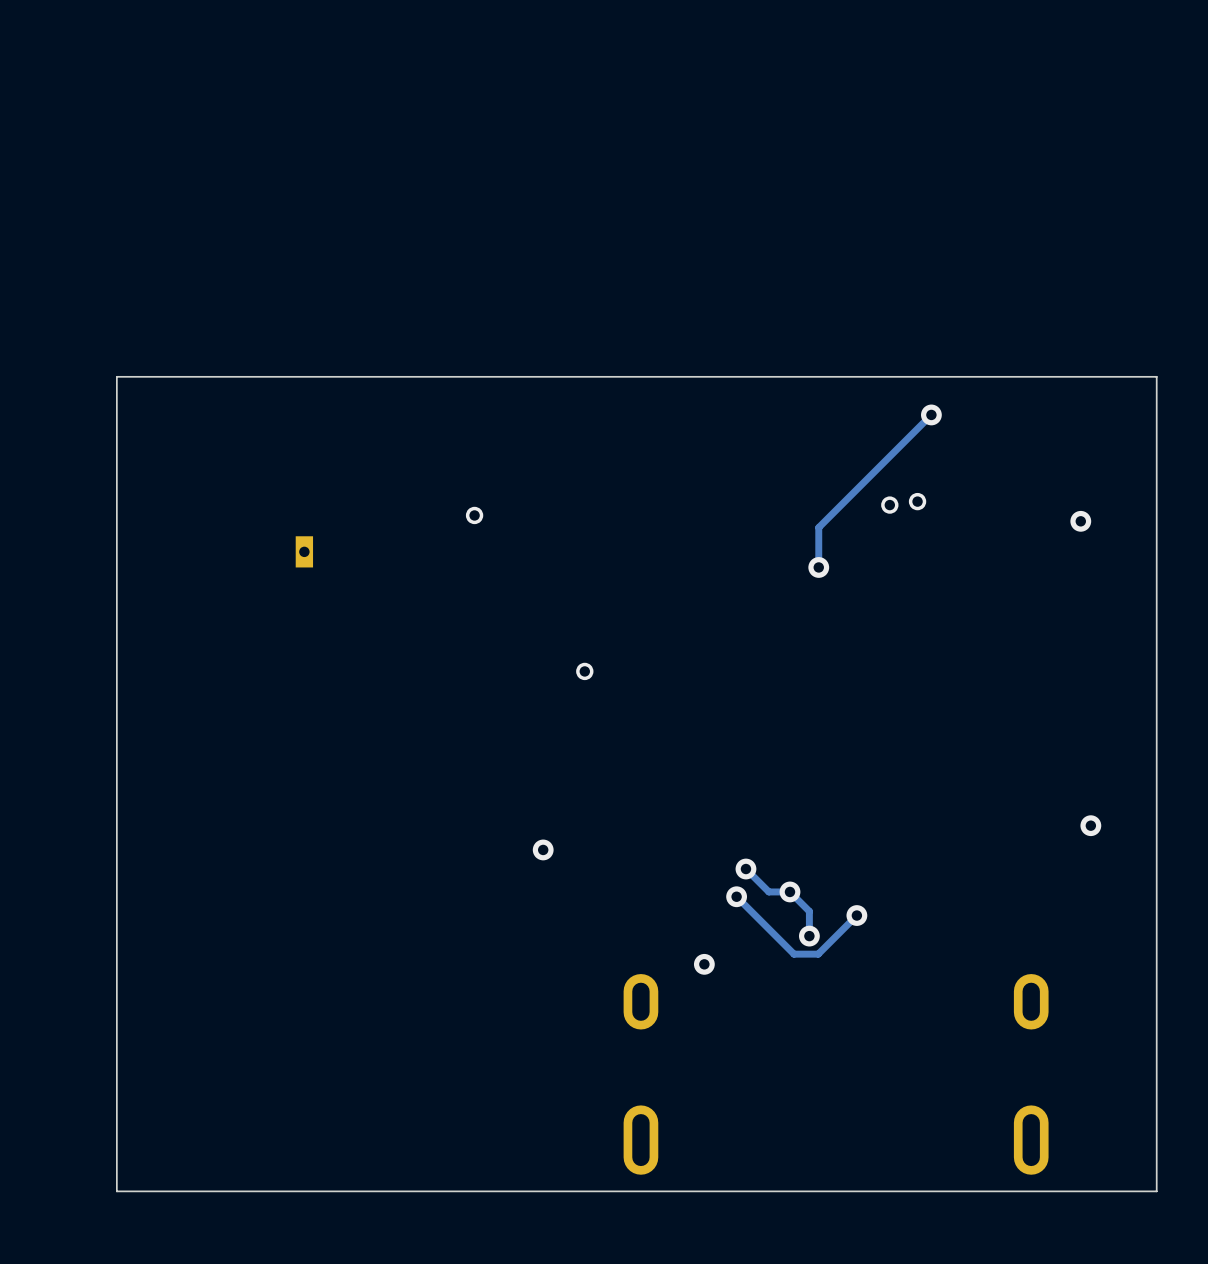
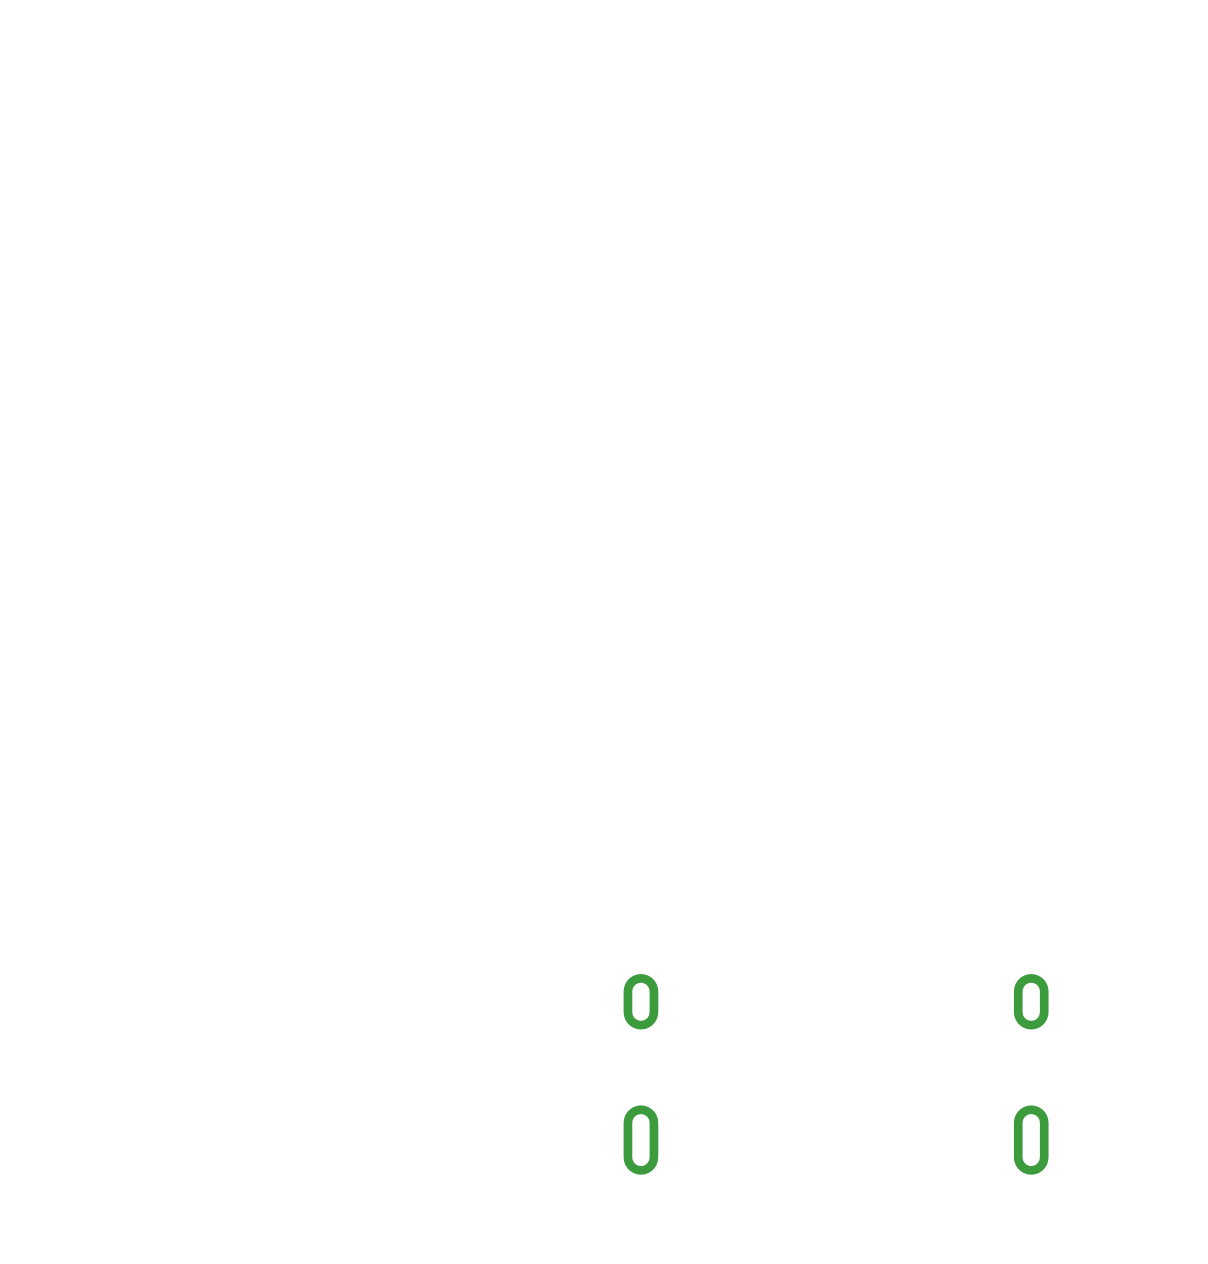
board edge: (1156, 376) (116, 376) (116, 1191) (1156, 1191) (1156, 376) -> none
track: (931, 414) (818, 527) (818, 567) -> none
via: (931, 414) -> none
via: (917, 501) -> none
via: (889, 505) -> none
via: (474, 515) -> none
via: (1080, 521) -> none
part: (304, 551) -> none
via: (818, 567) -> none
via: (584, 671) -> none
via: (1090, 825) -> none
via: (543, 849) -> none
track: (745, 869) (768, 891) (789, 891) (809, 911) (809, 936) -> none
via: (745, 869) -> none
via: (789, 891) -> none
track: (736, 896) (794, 954) (818, 954) (856, 915) -> none
via: (736, 896) -> none
via: (856, 915) -> none
via: (809, 936) -> none
via: (704, 964) -> none

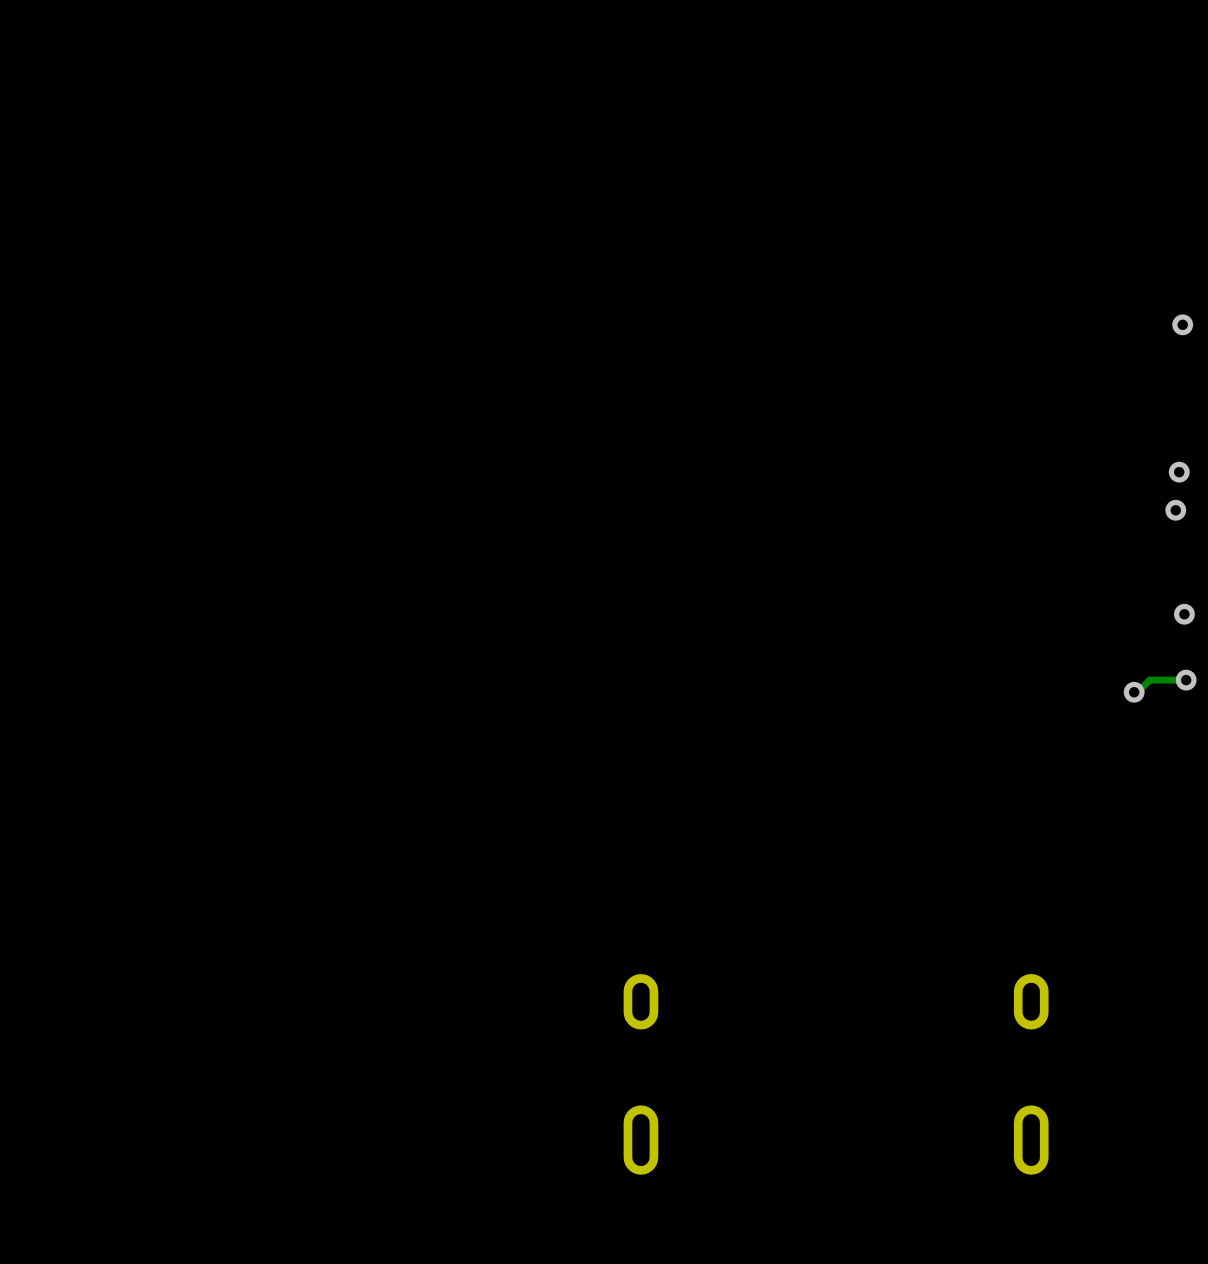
via: none -> (1182, 324)
via: none -> (1179, 472)
via: none -> (1175, 510)
via: none -> (1184, 614)
track: none -> (1186, 680) (1149, 680) (1137, 692) (1134, 692)
via: none -> (1186, 680)
via: none -> (1134, 692)

